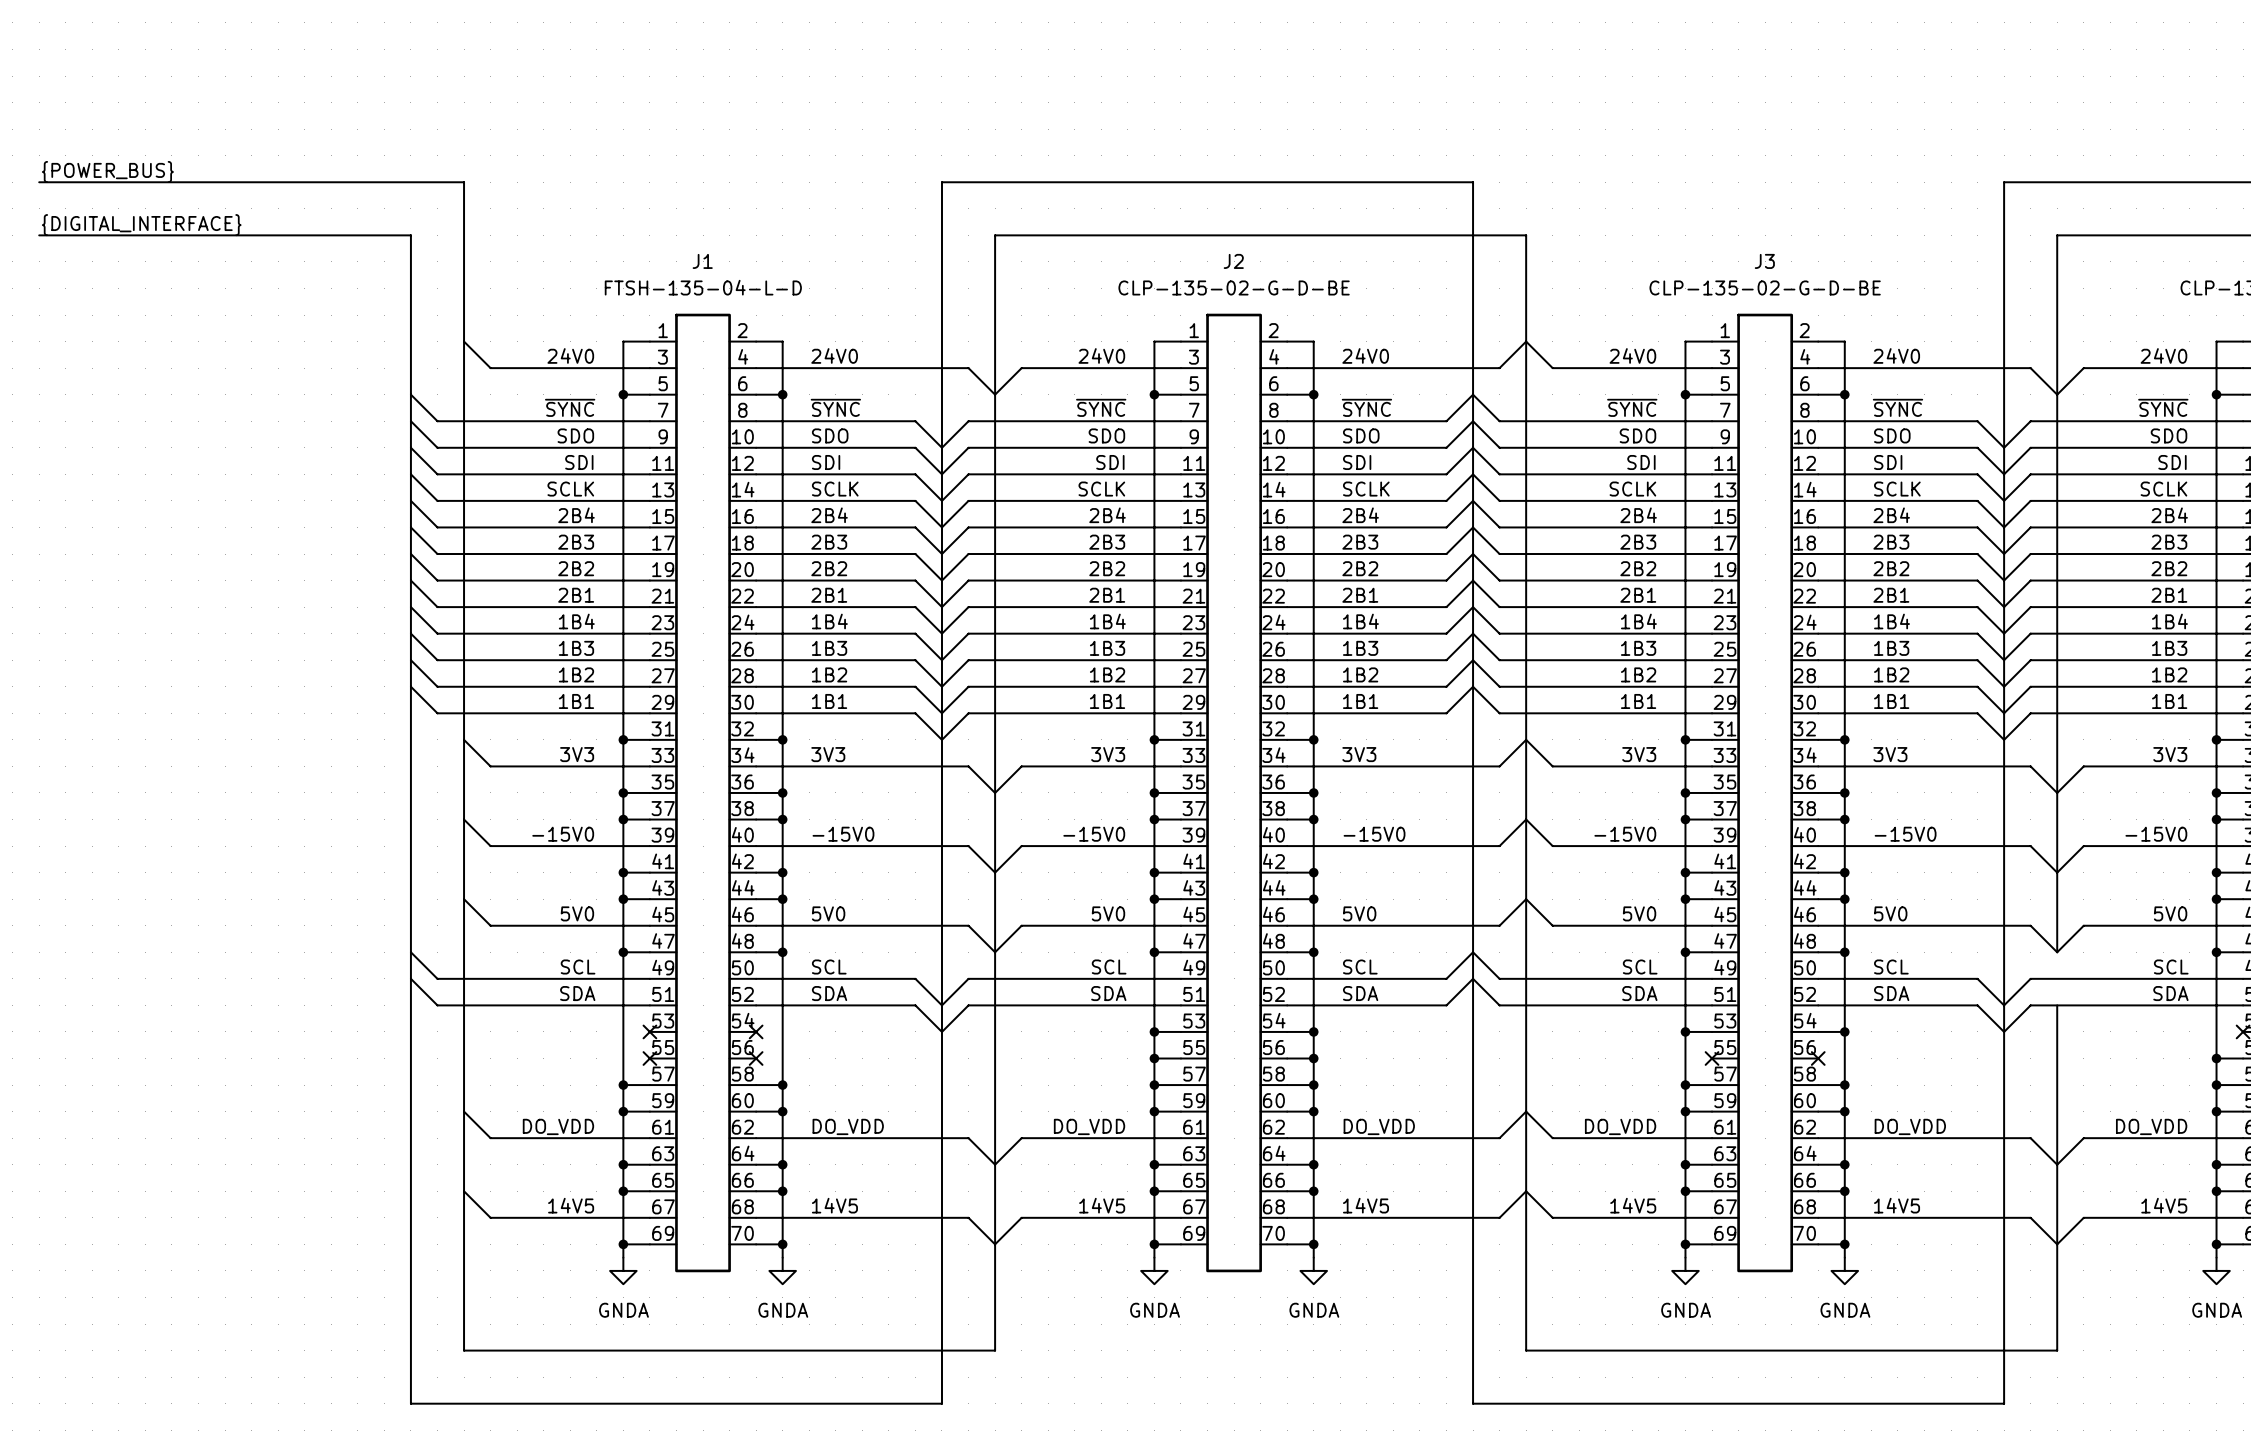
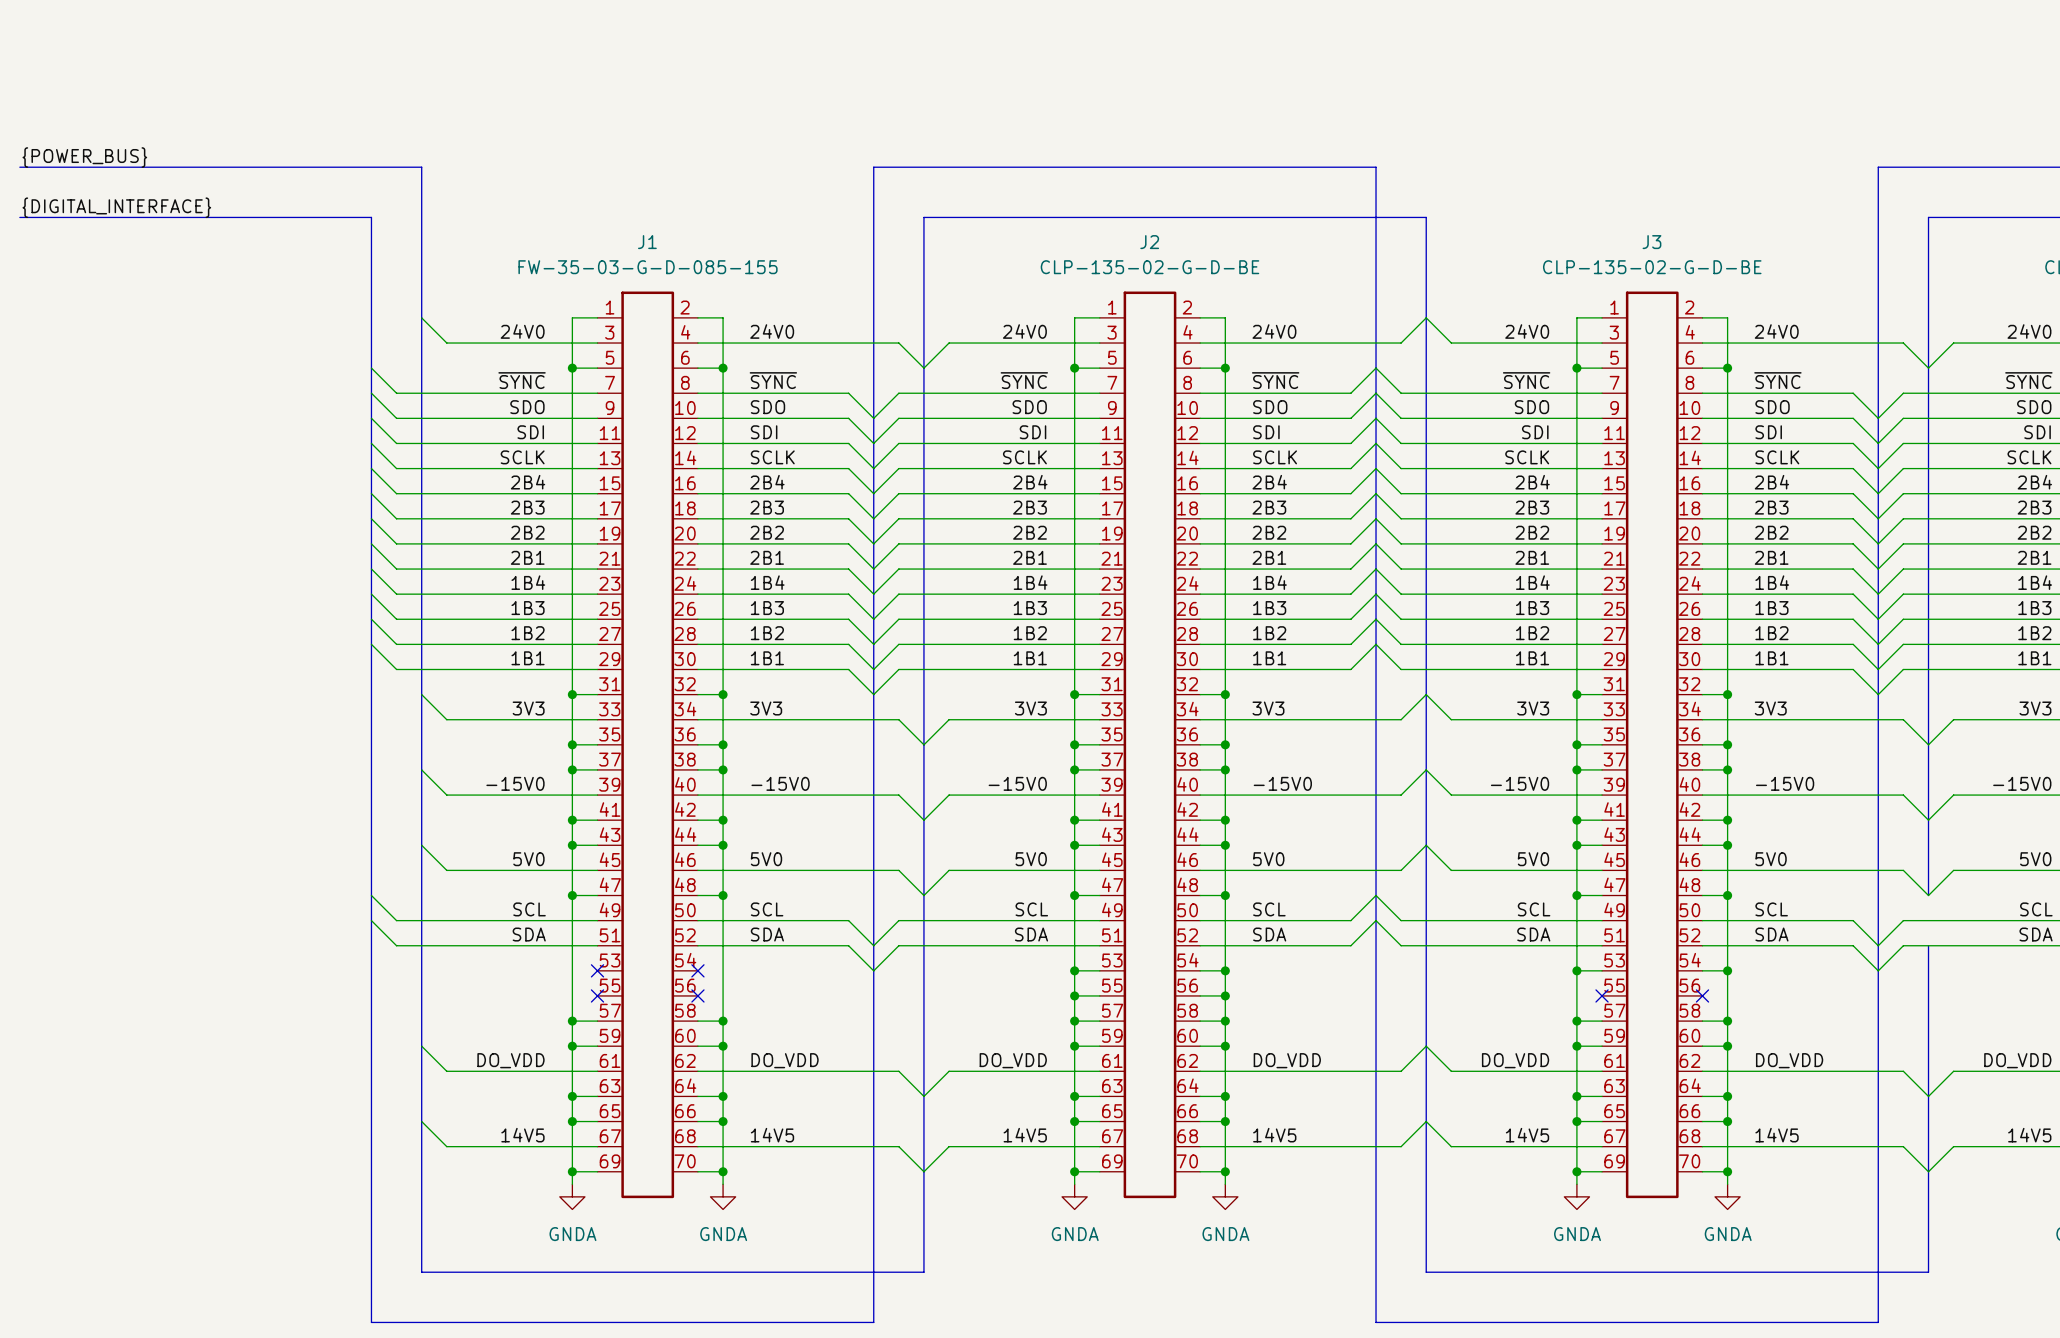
J1 value: FTSH-135-04-L-D (703, 287) -> FW-35-03-G-D-085-155 (648, 267)

